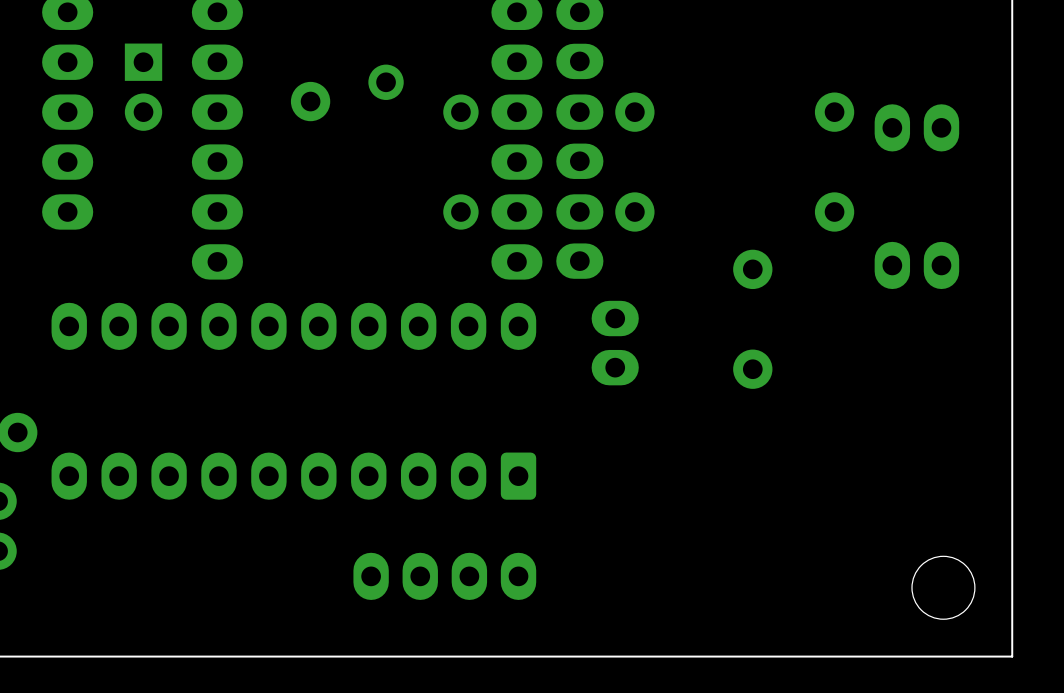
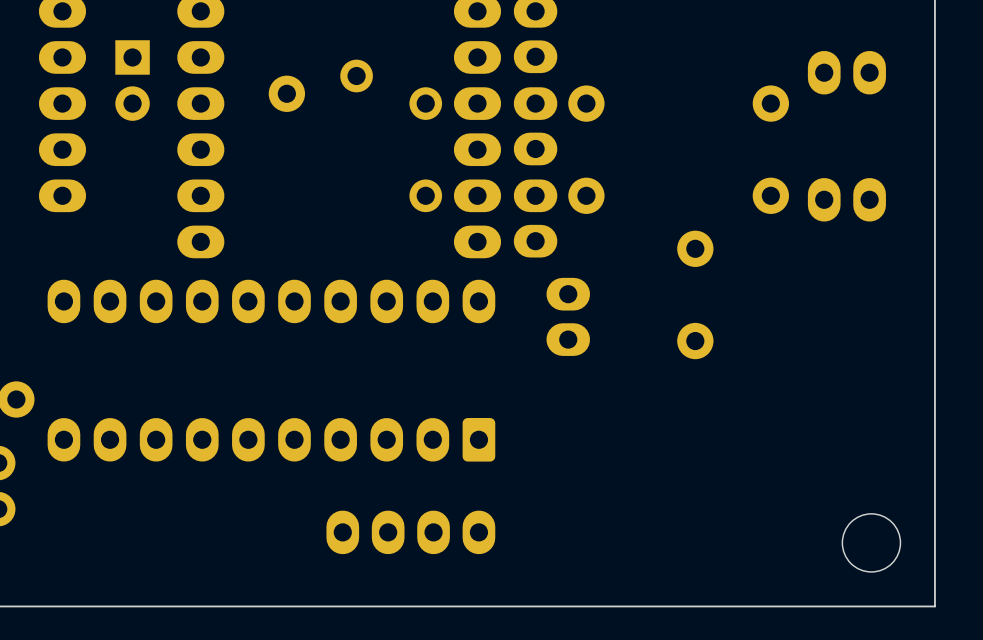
part: none -> (846, 72)
part: (916, 127) -> none
part: none -> (846, 199)
part: (916, 265) -> none

